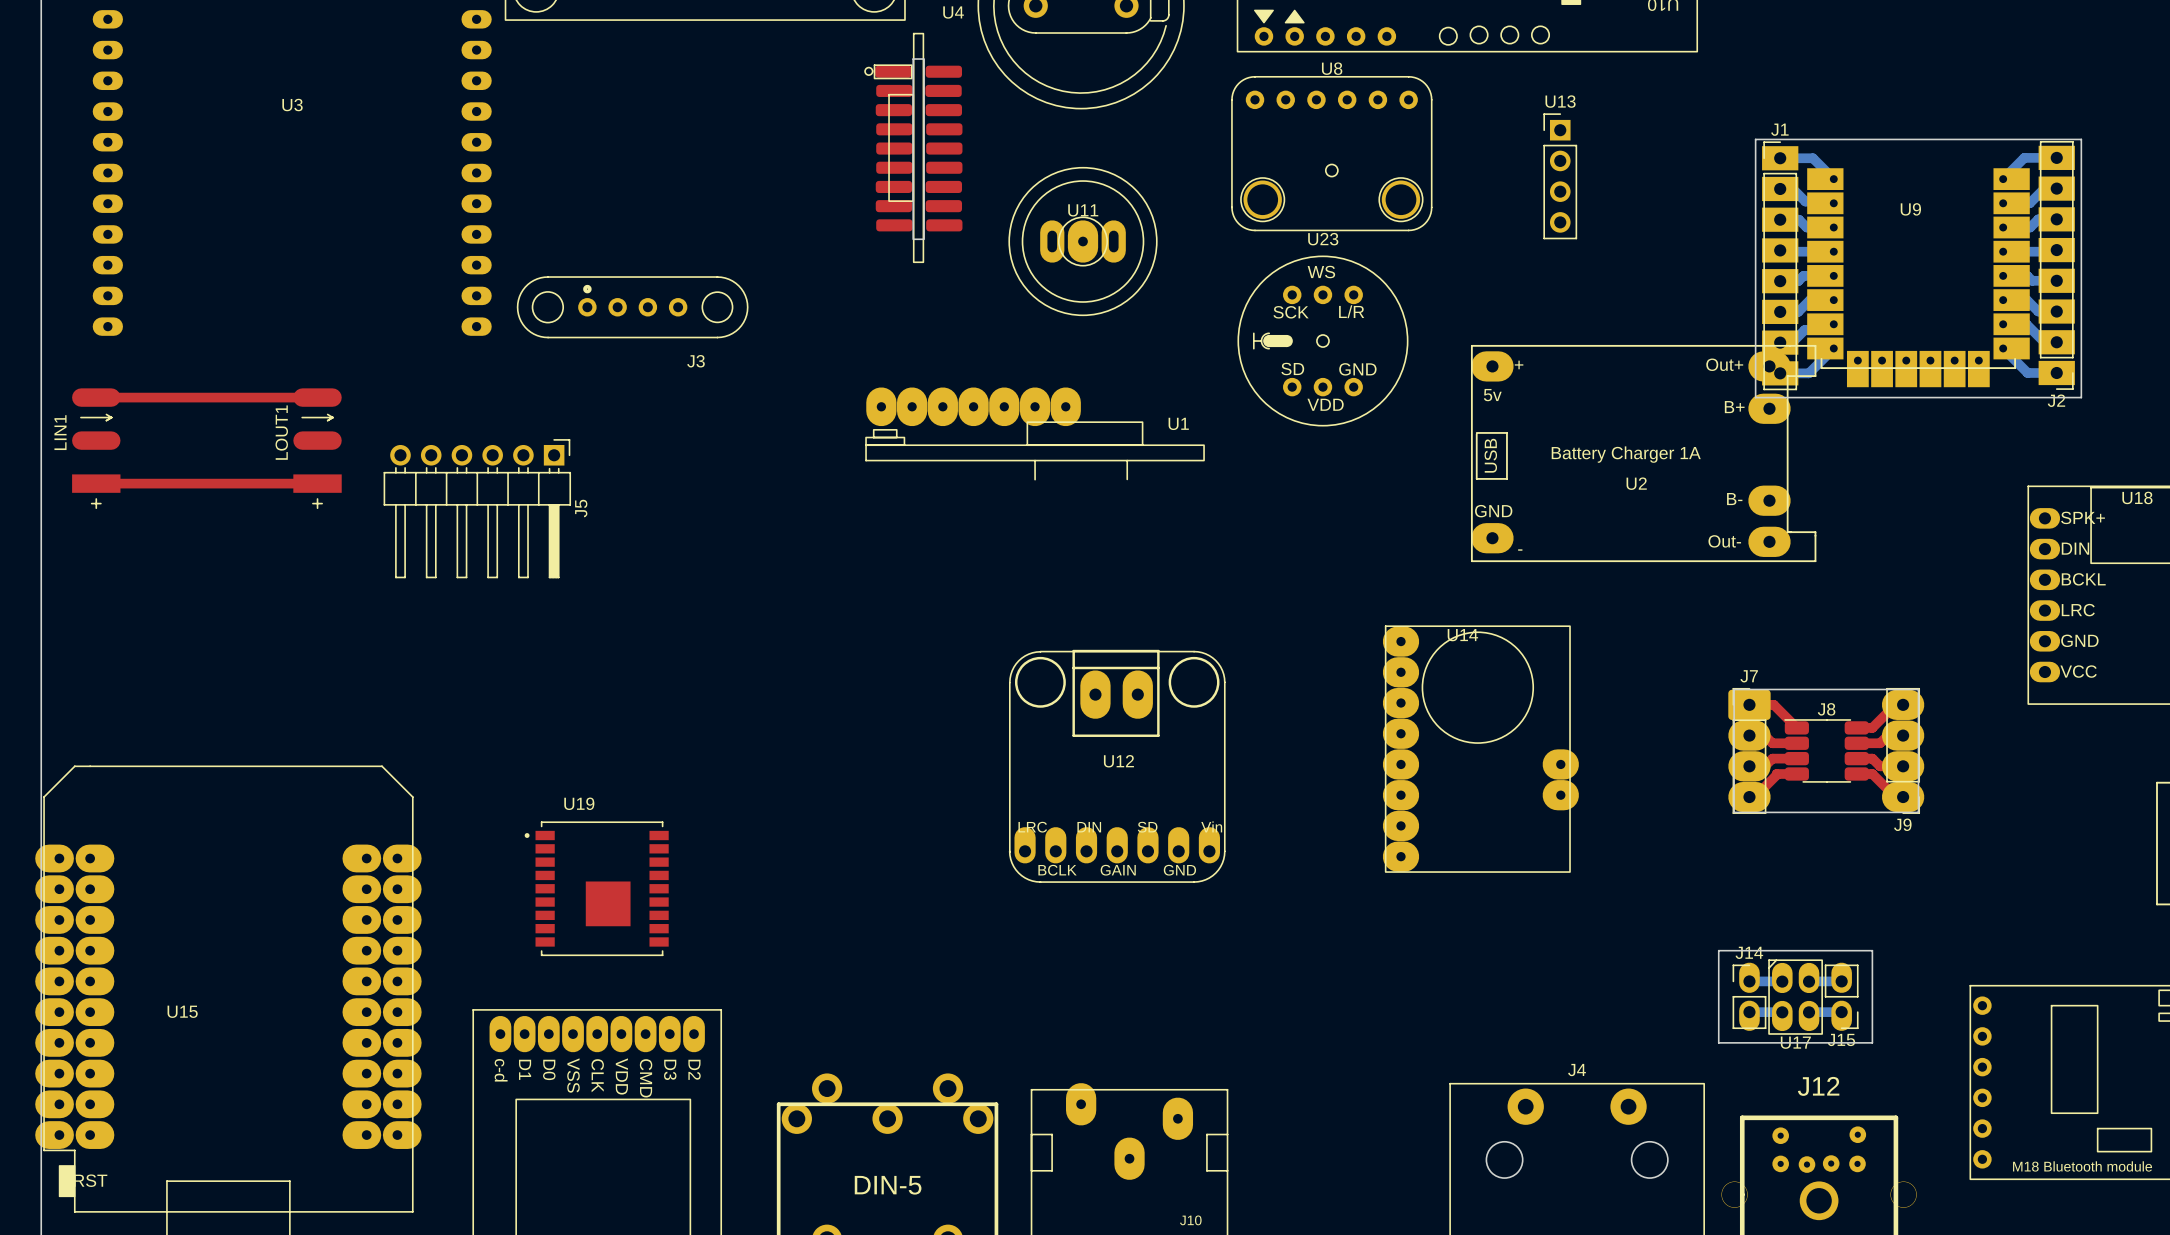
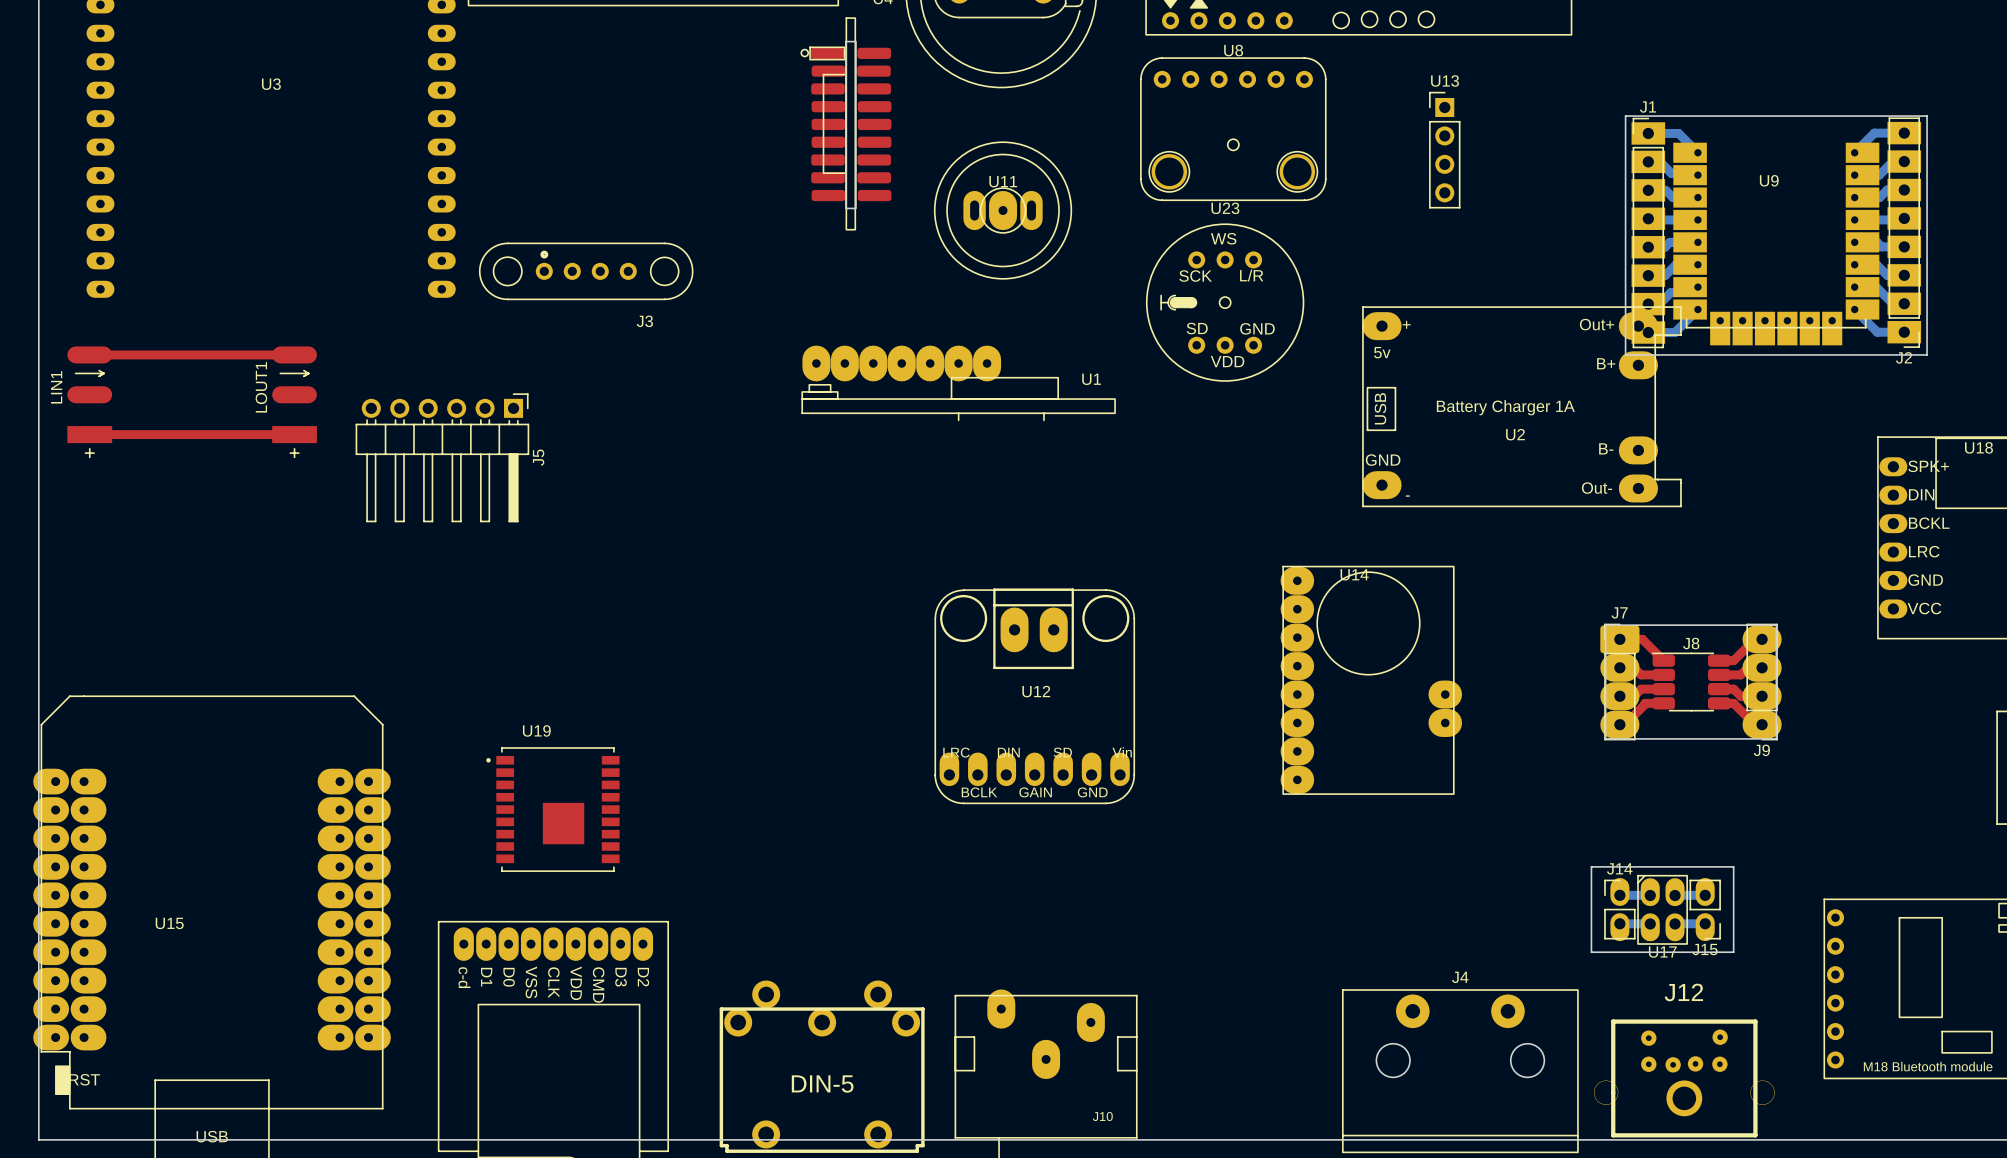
U1 footprint: [865, 387, 1205, 481] -> [801, 345, 1116, 422]

